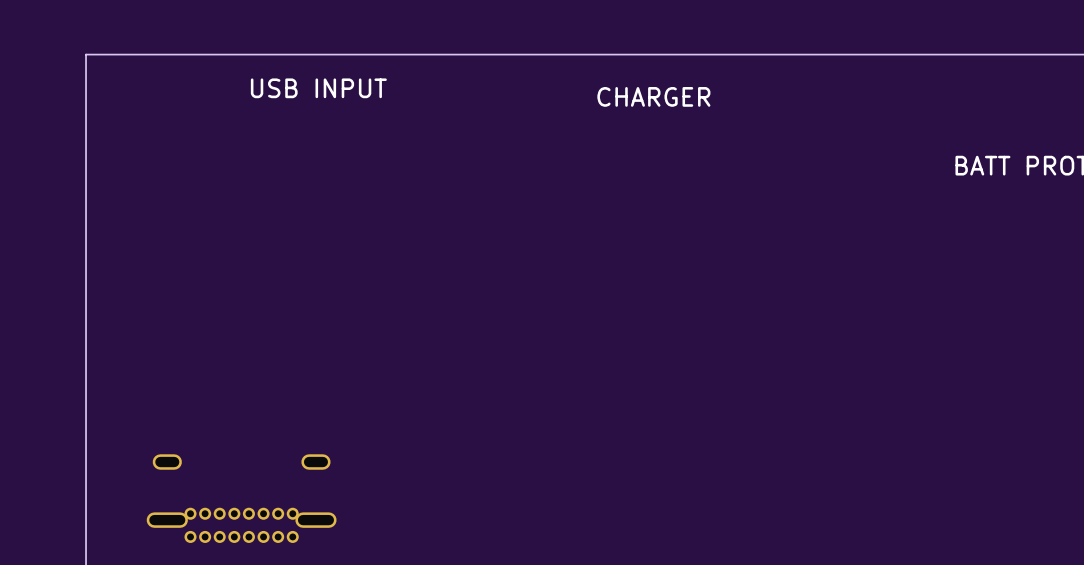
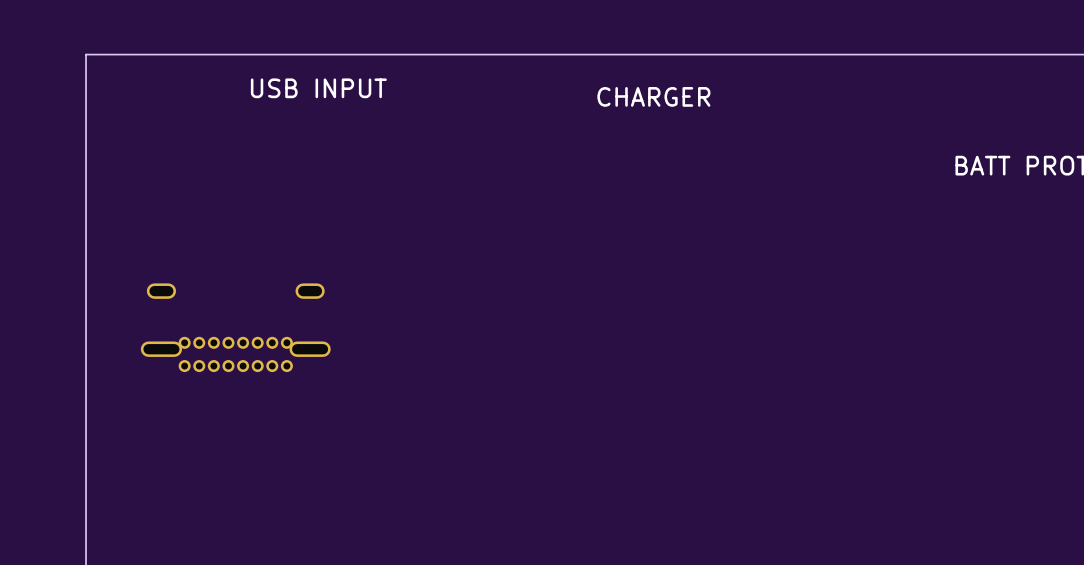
part position: (241, 498) -> (235, 327)

